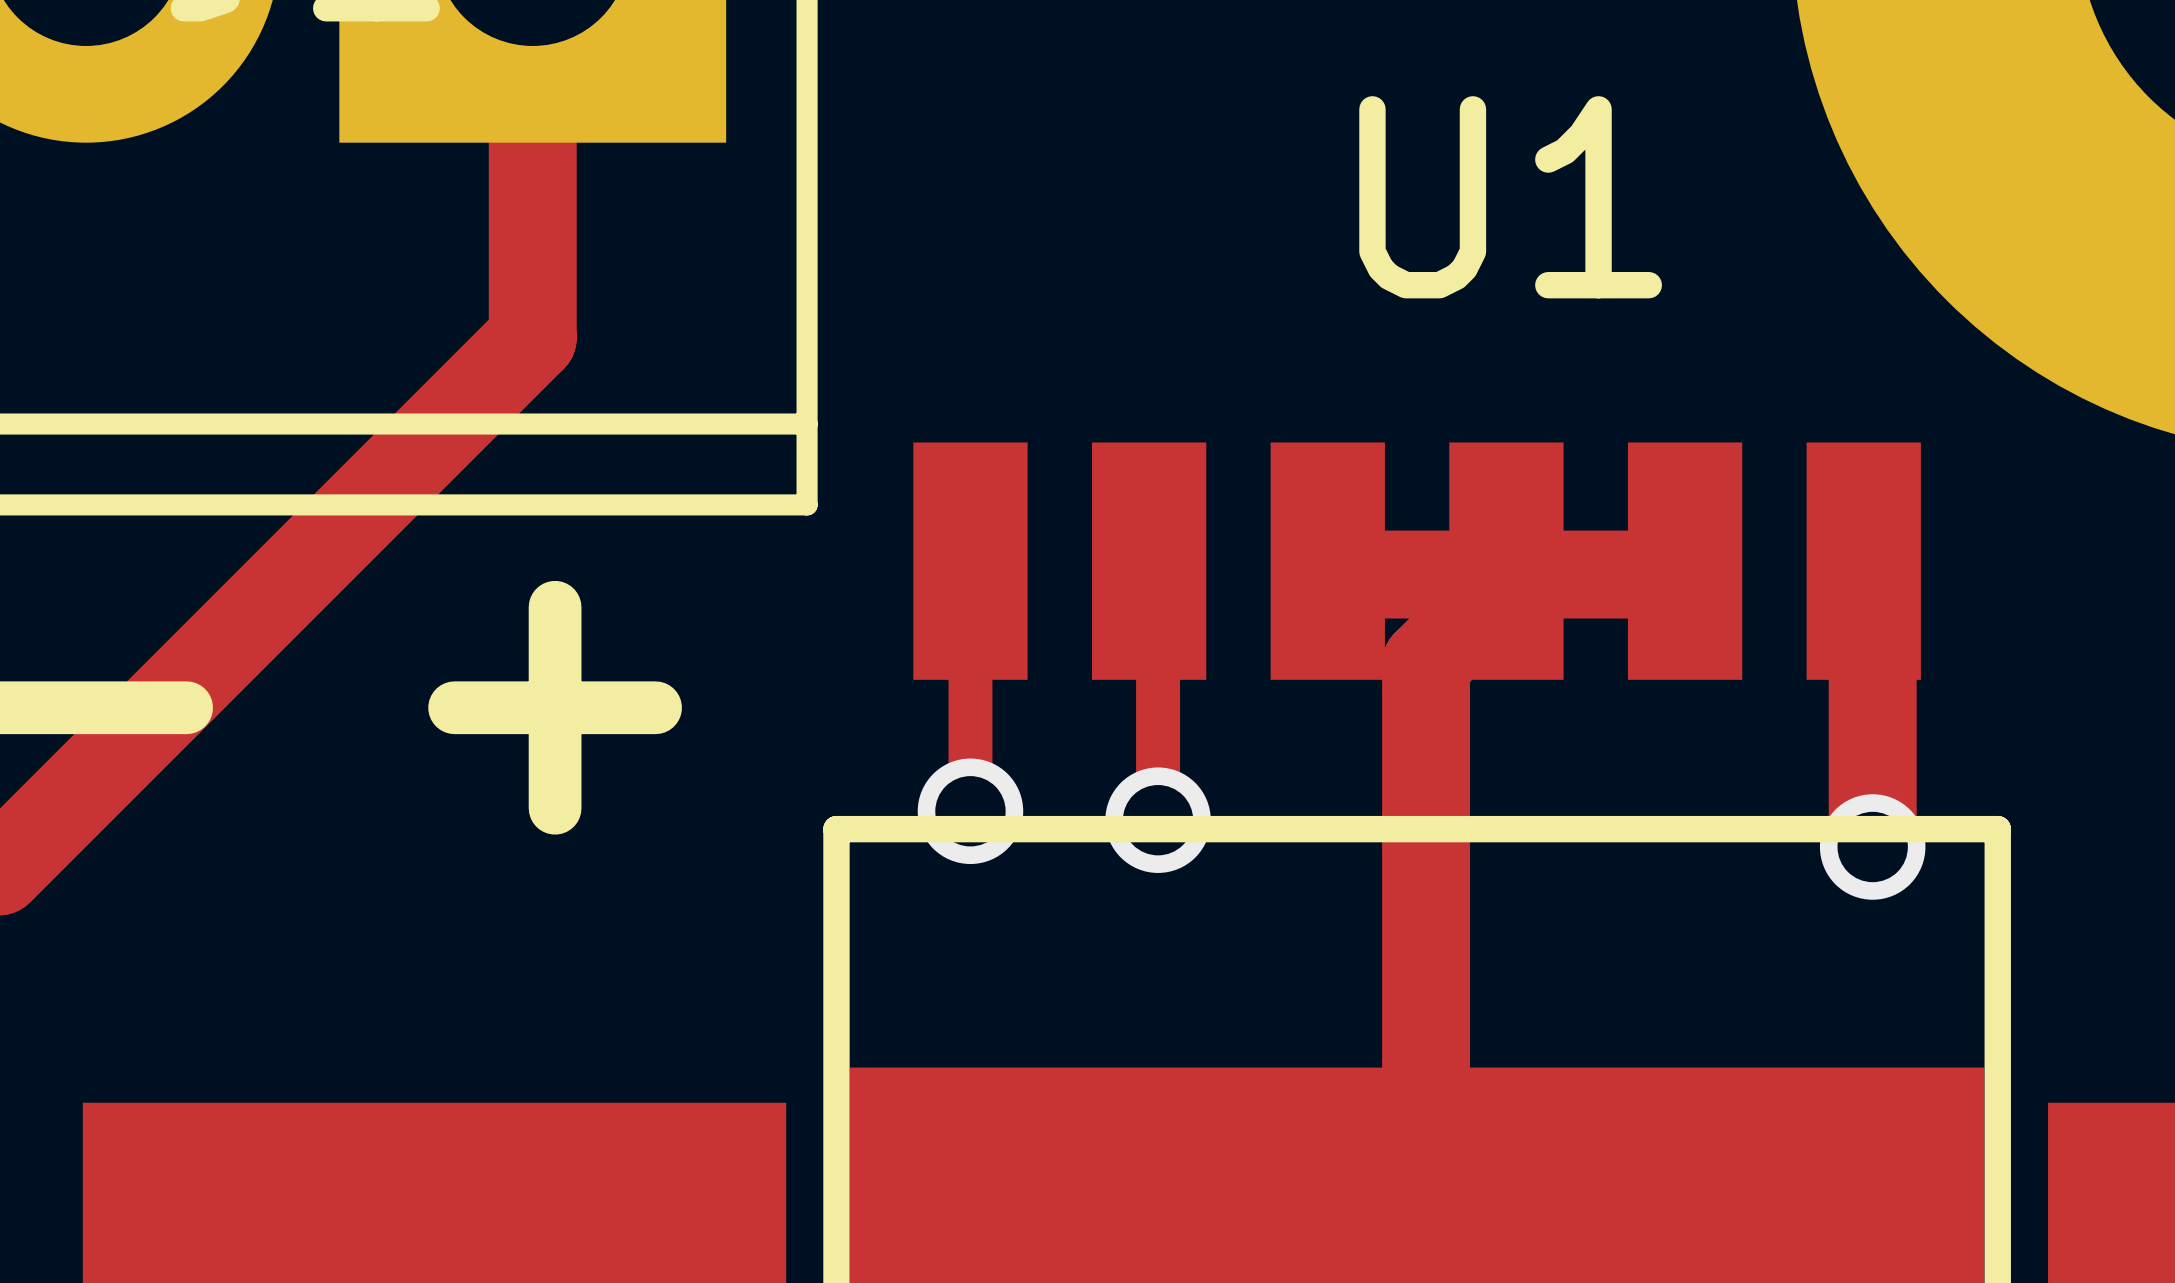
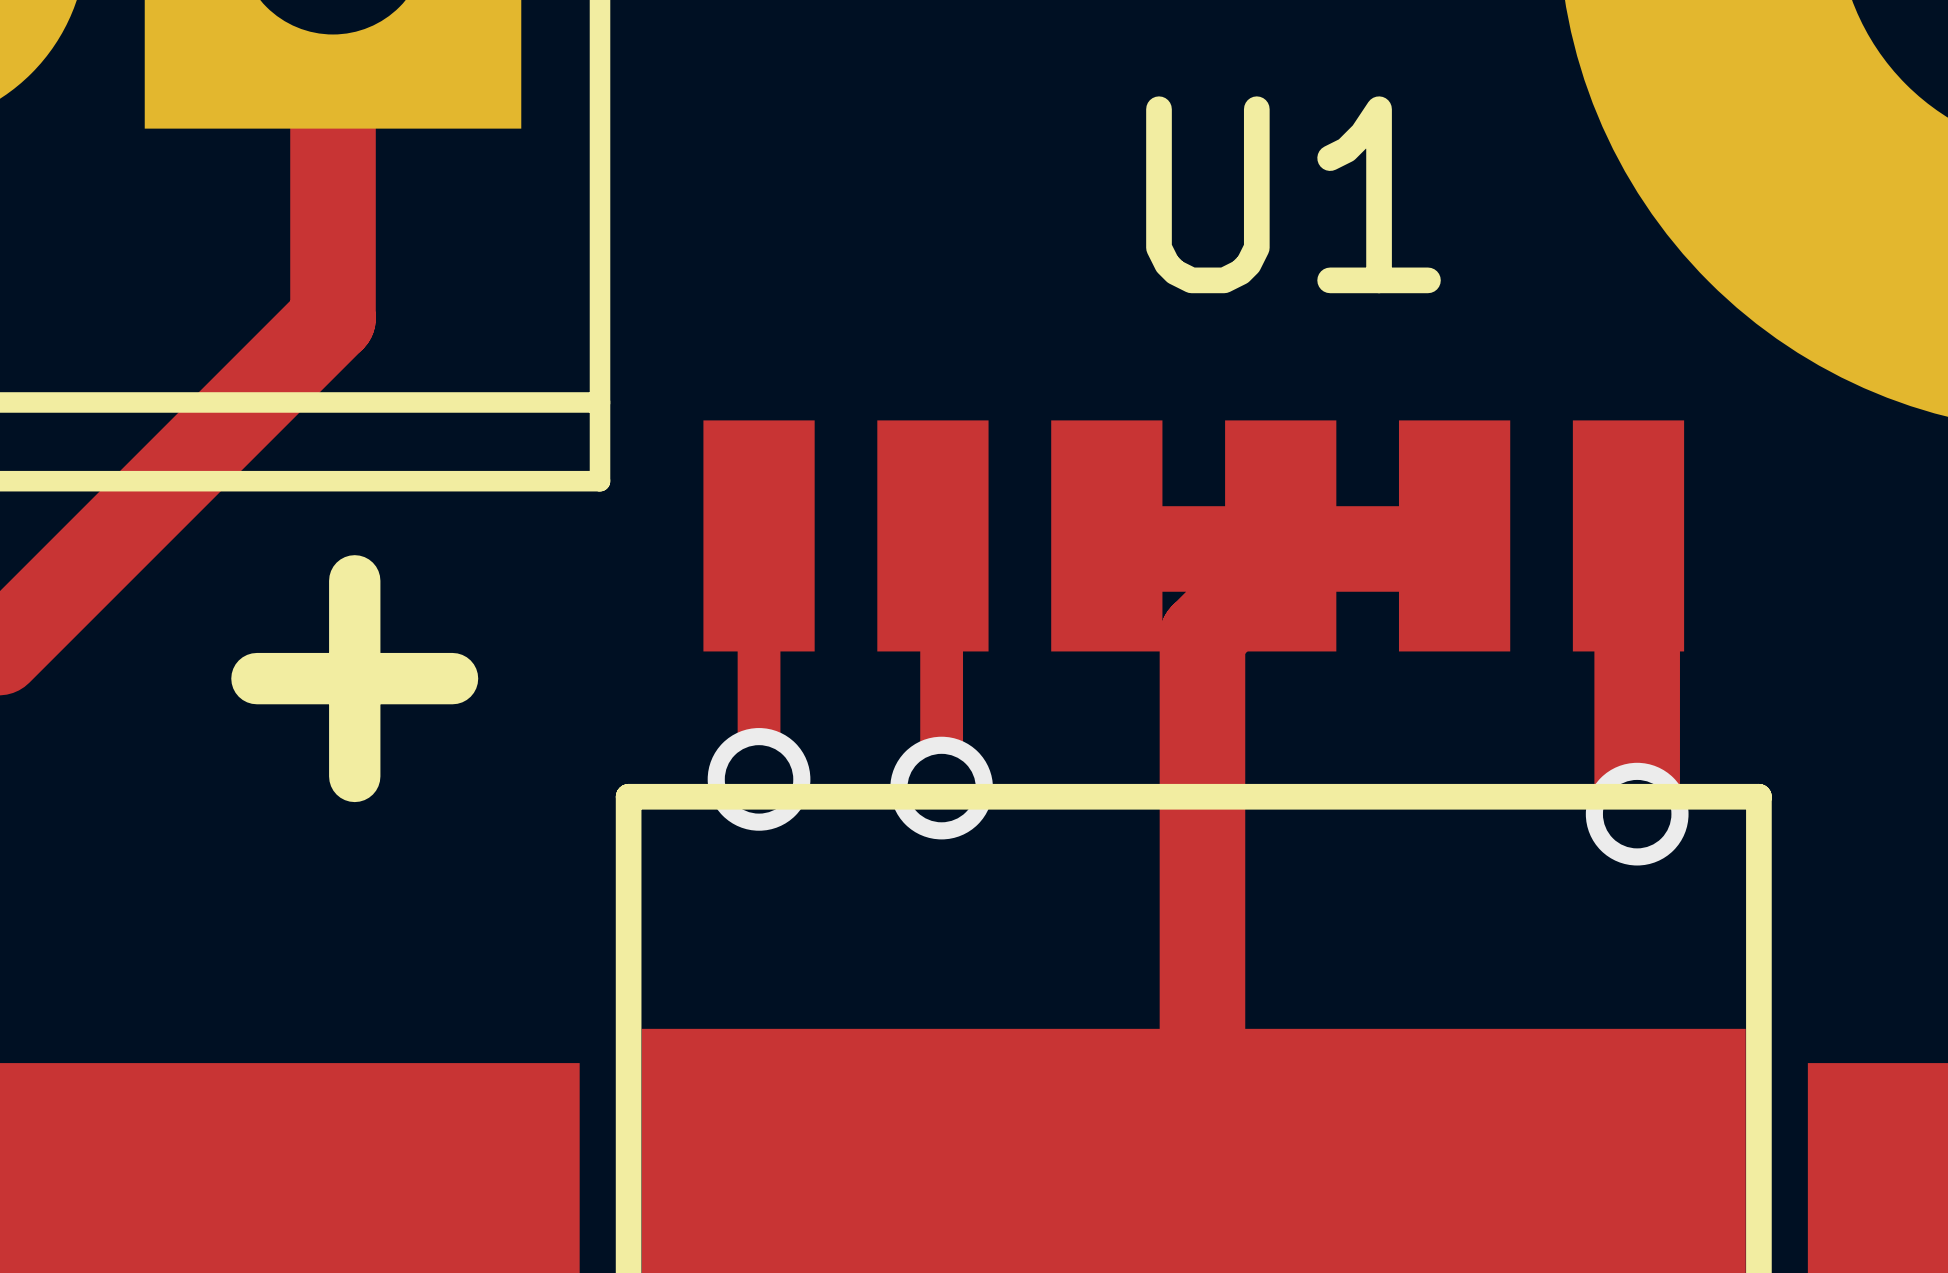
U1 name position: U1 (1510, 197) -> U1 (1293, 194)

